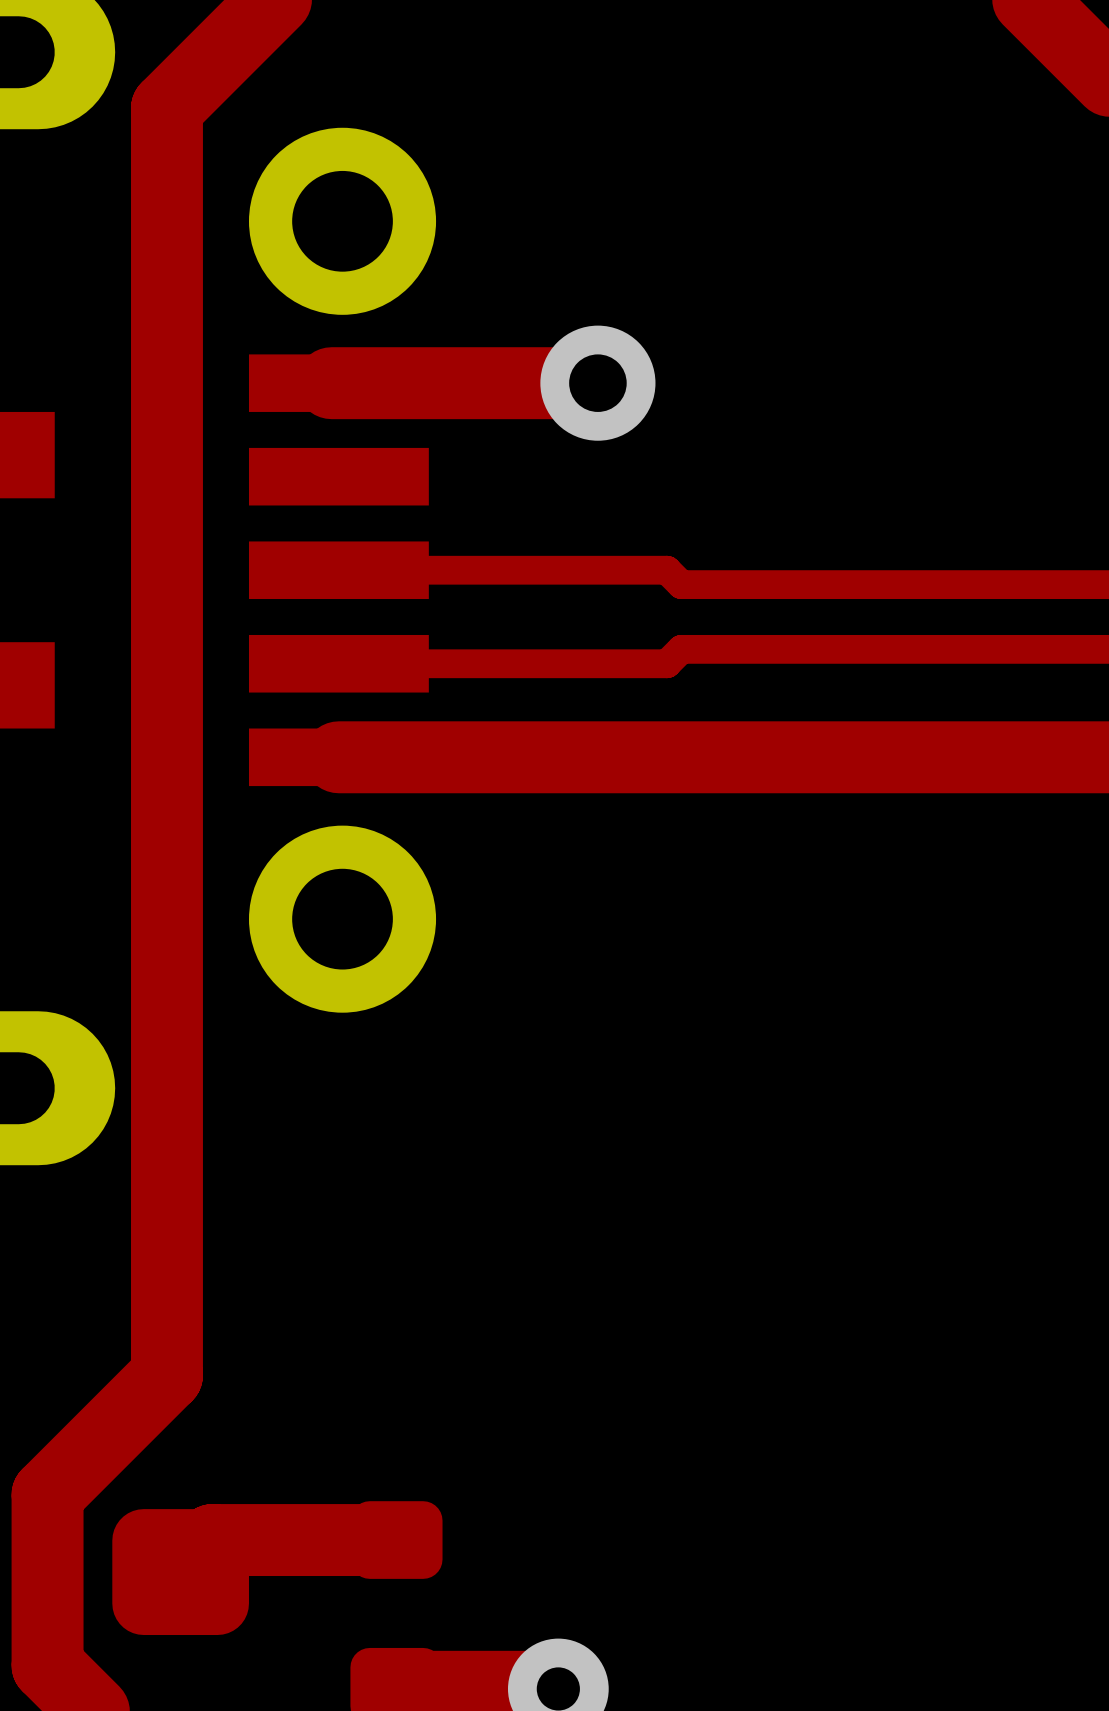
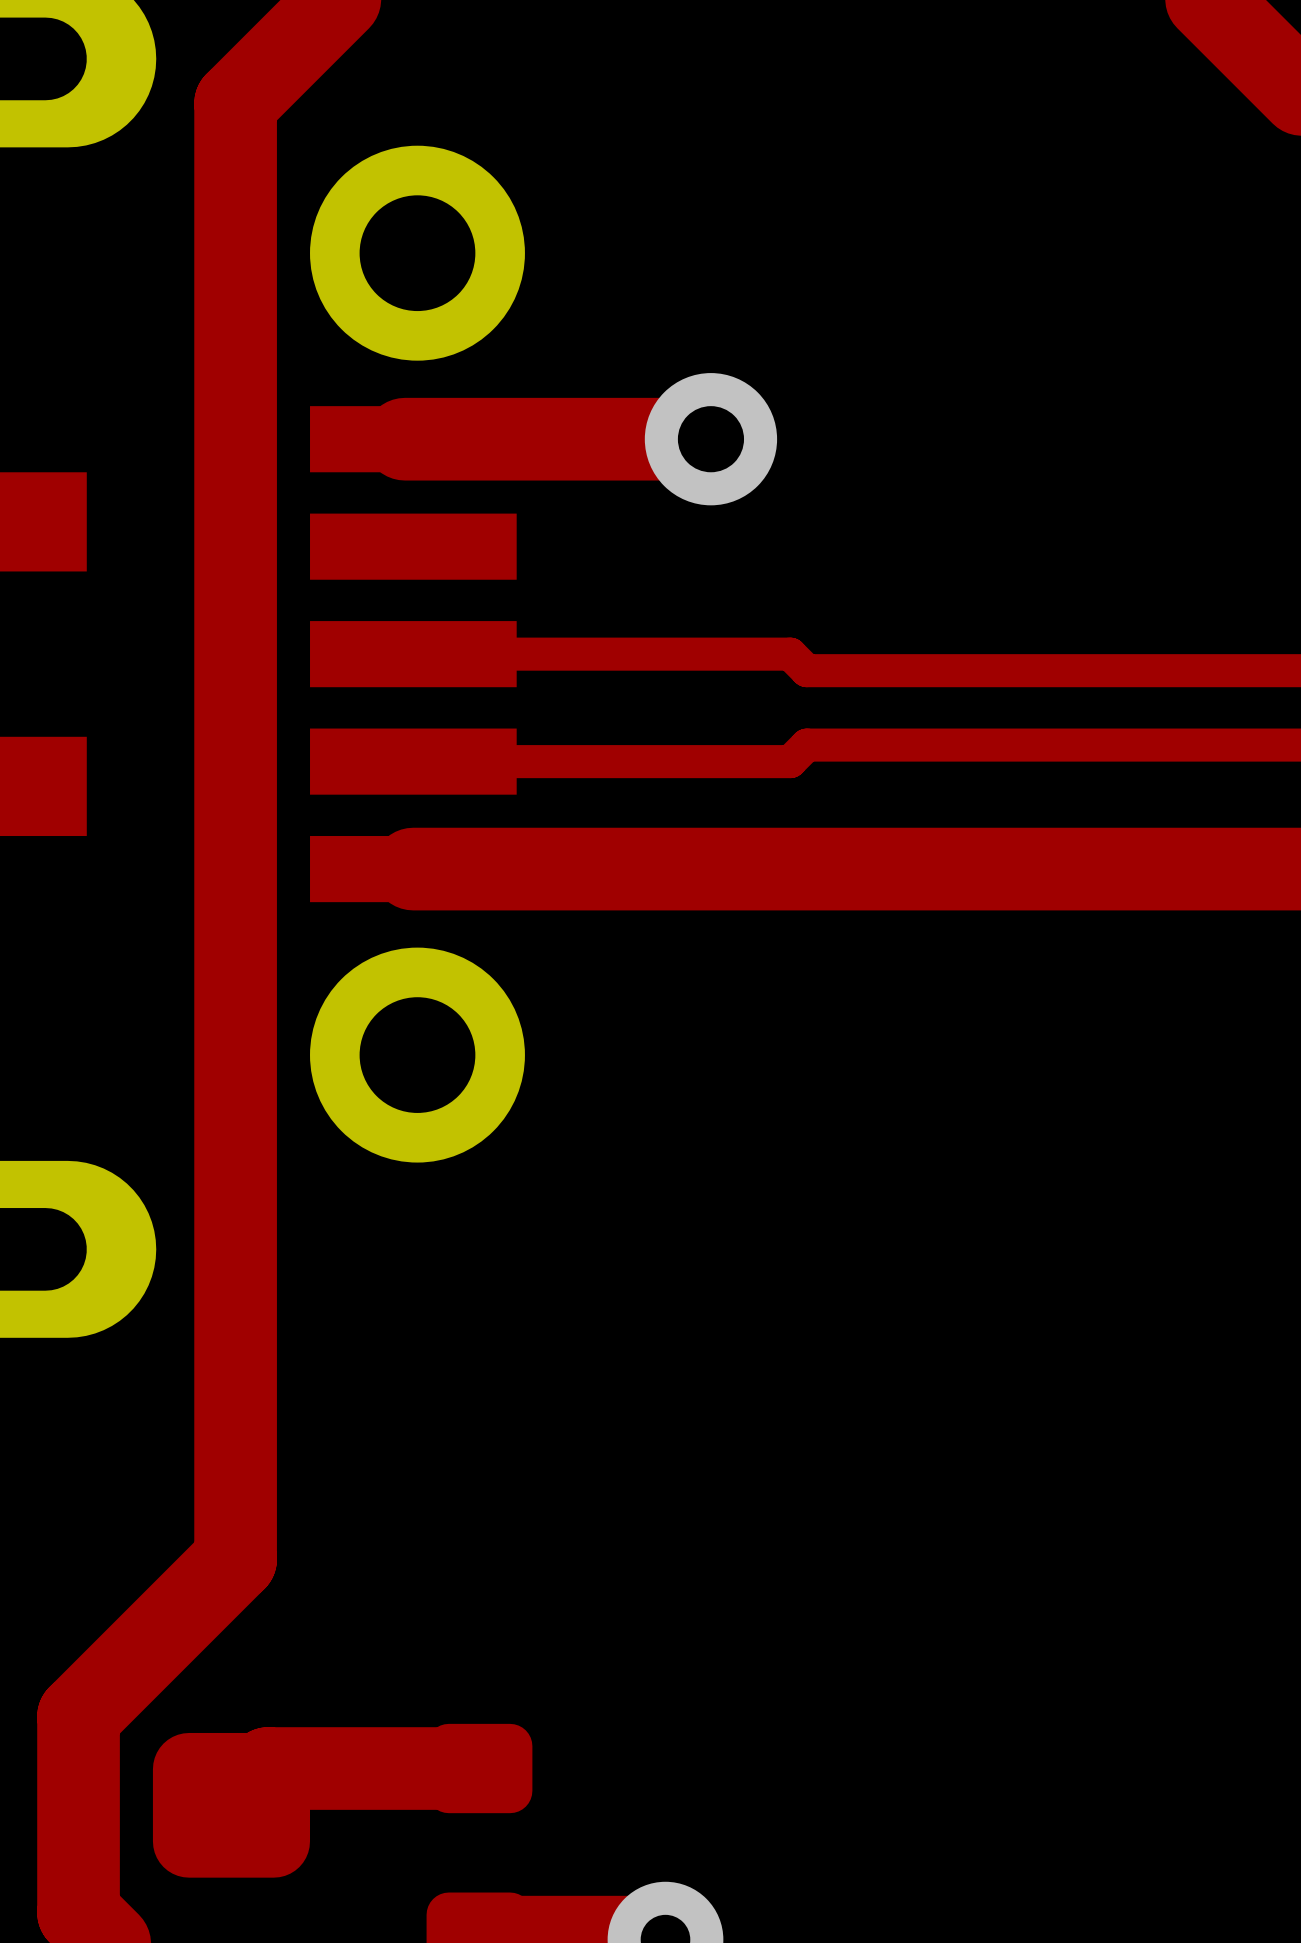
top track: (184, 90) (166, 108) (166, 1375) -> (235, 103) (235, 1559) (215, 1579)

